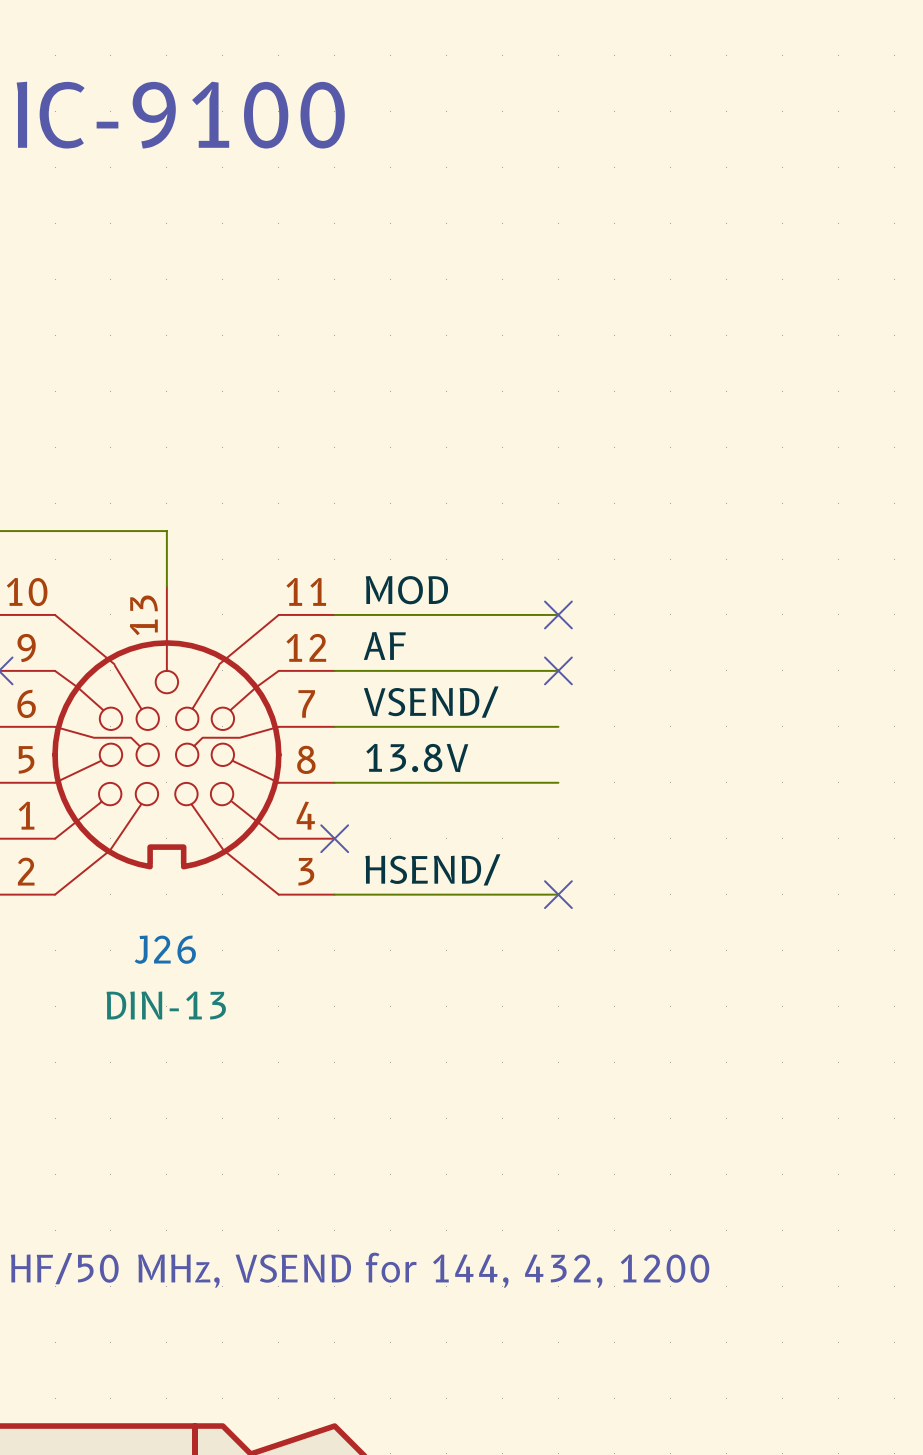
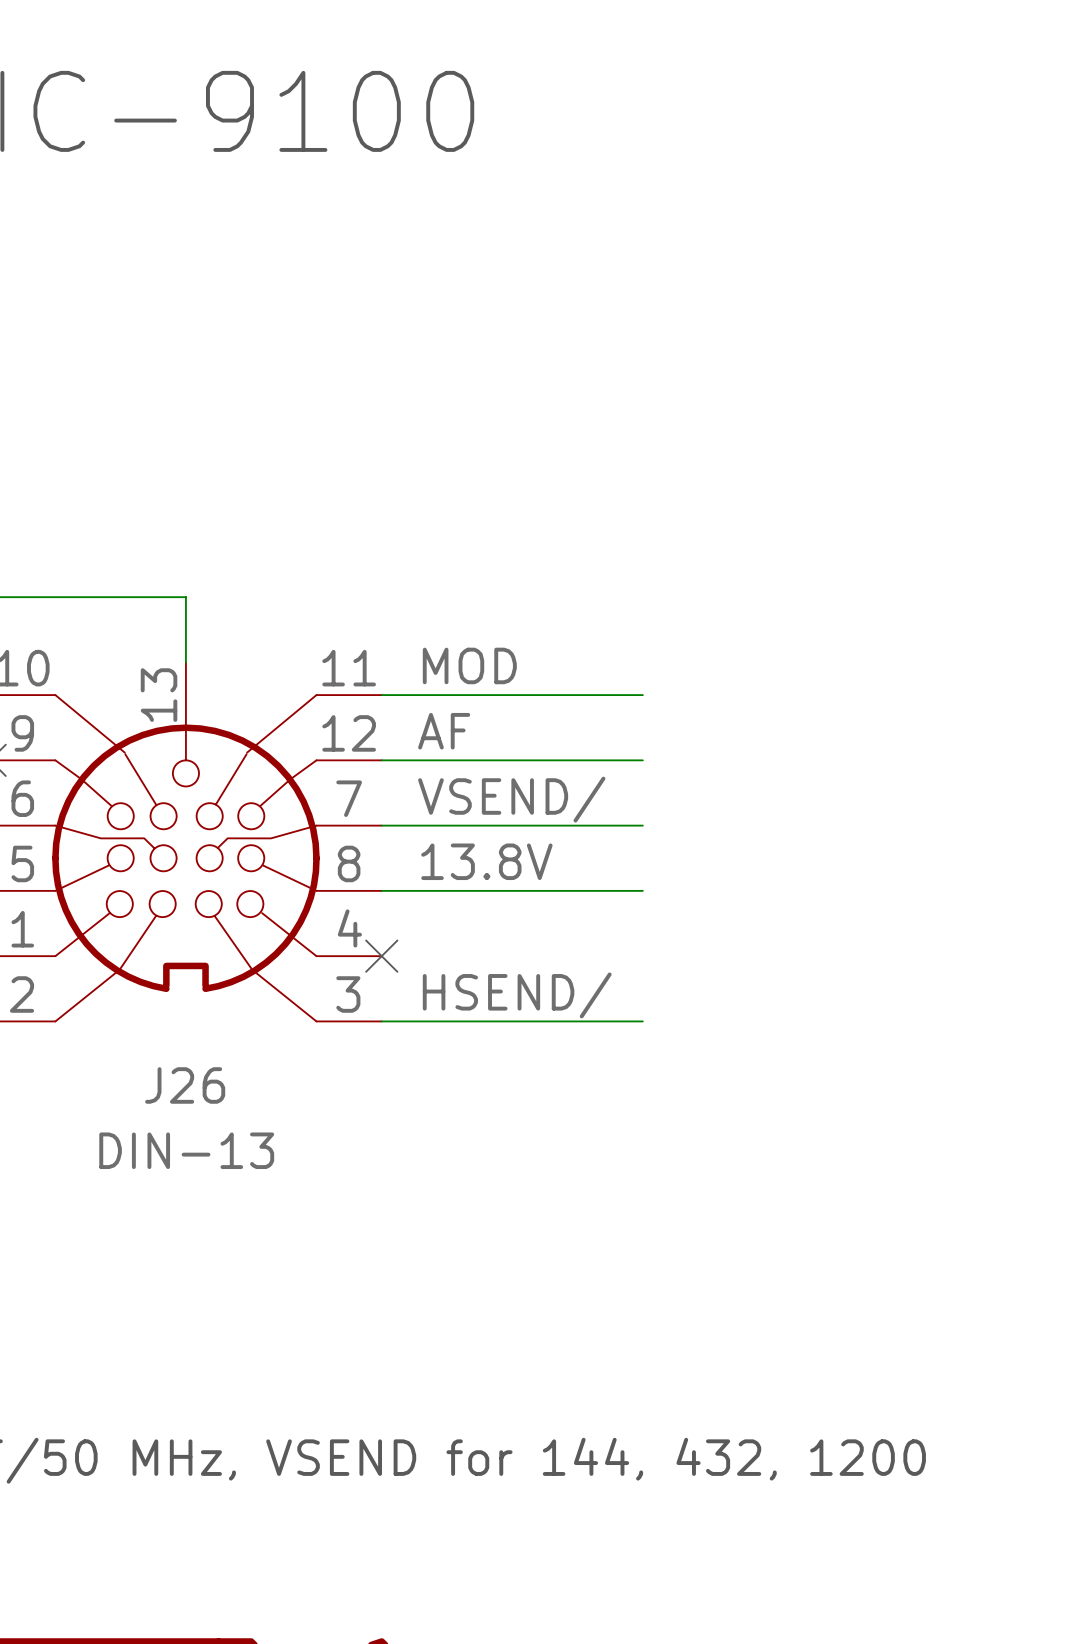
no-connect mark: (558, 614) -> none
no-connect mark: (558, 670) -> none
no-connect mark: (558, 894) -> none

